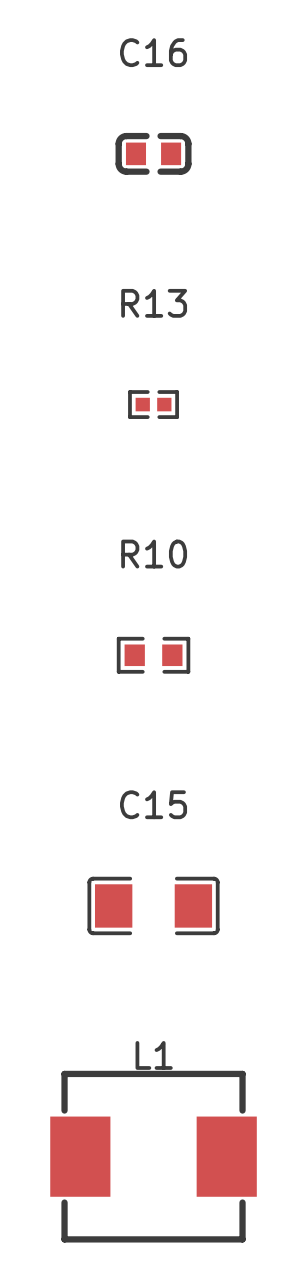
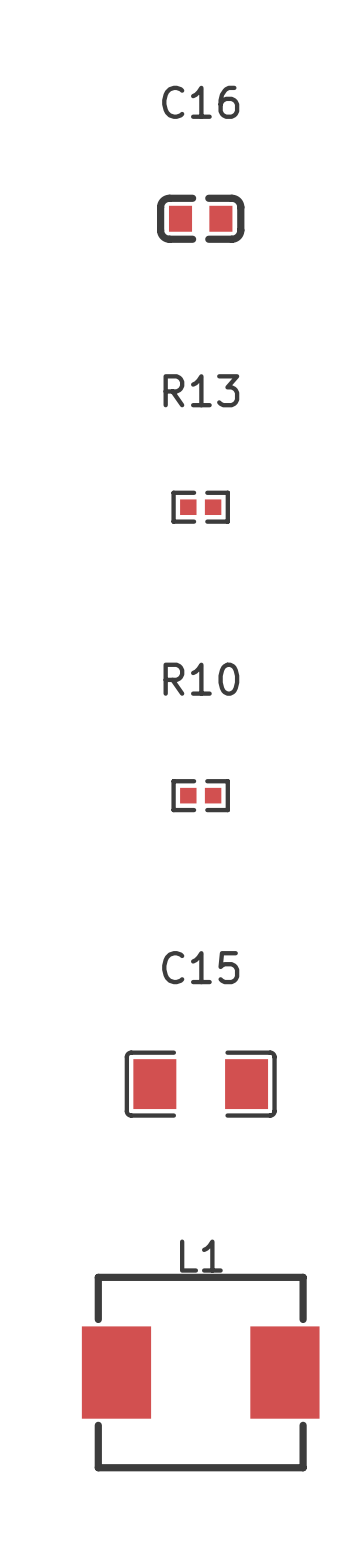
R10 footprint: [116, 636, 191, 674] -> [171, 779, 230, 813]

